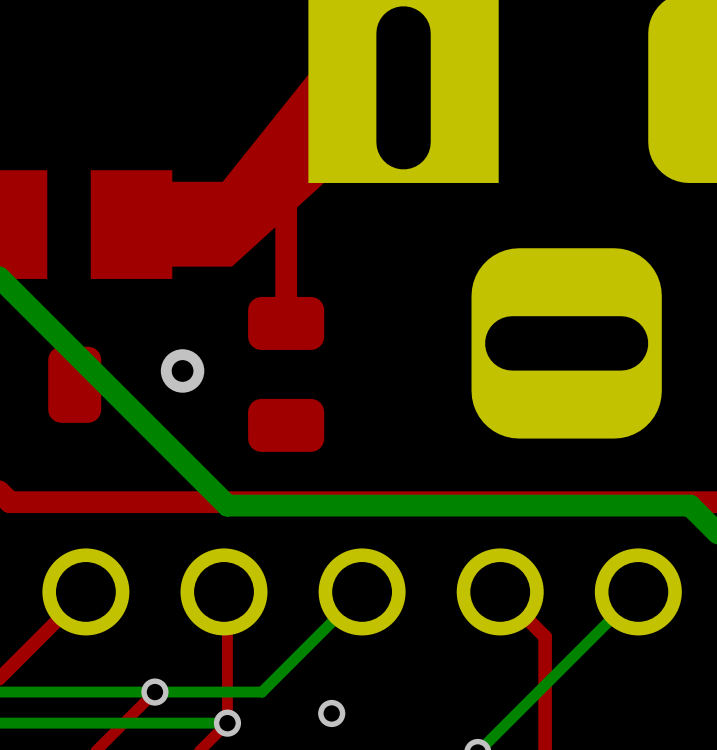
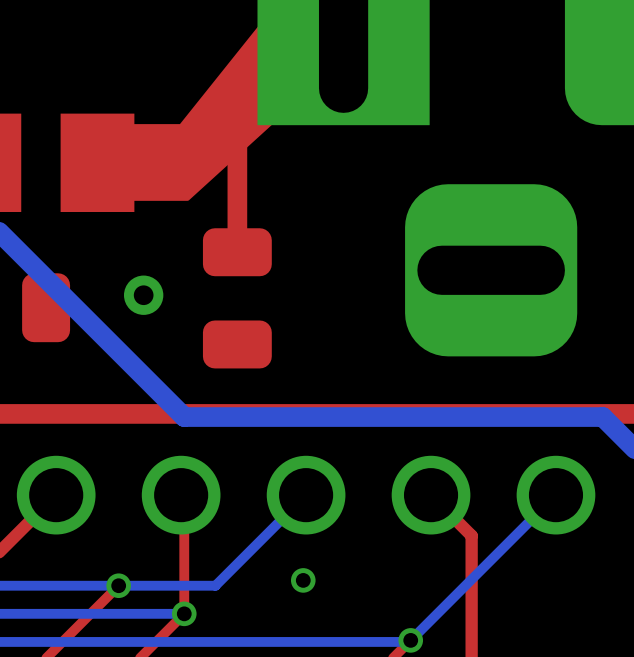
via position: (331, 713) -> (303, 580)

